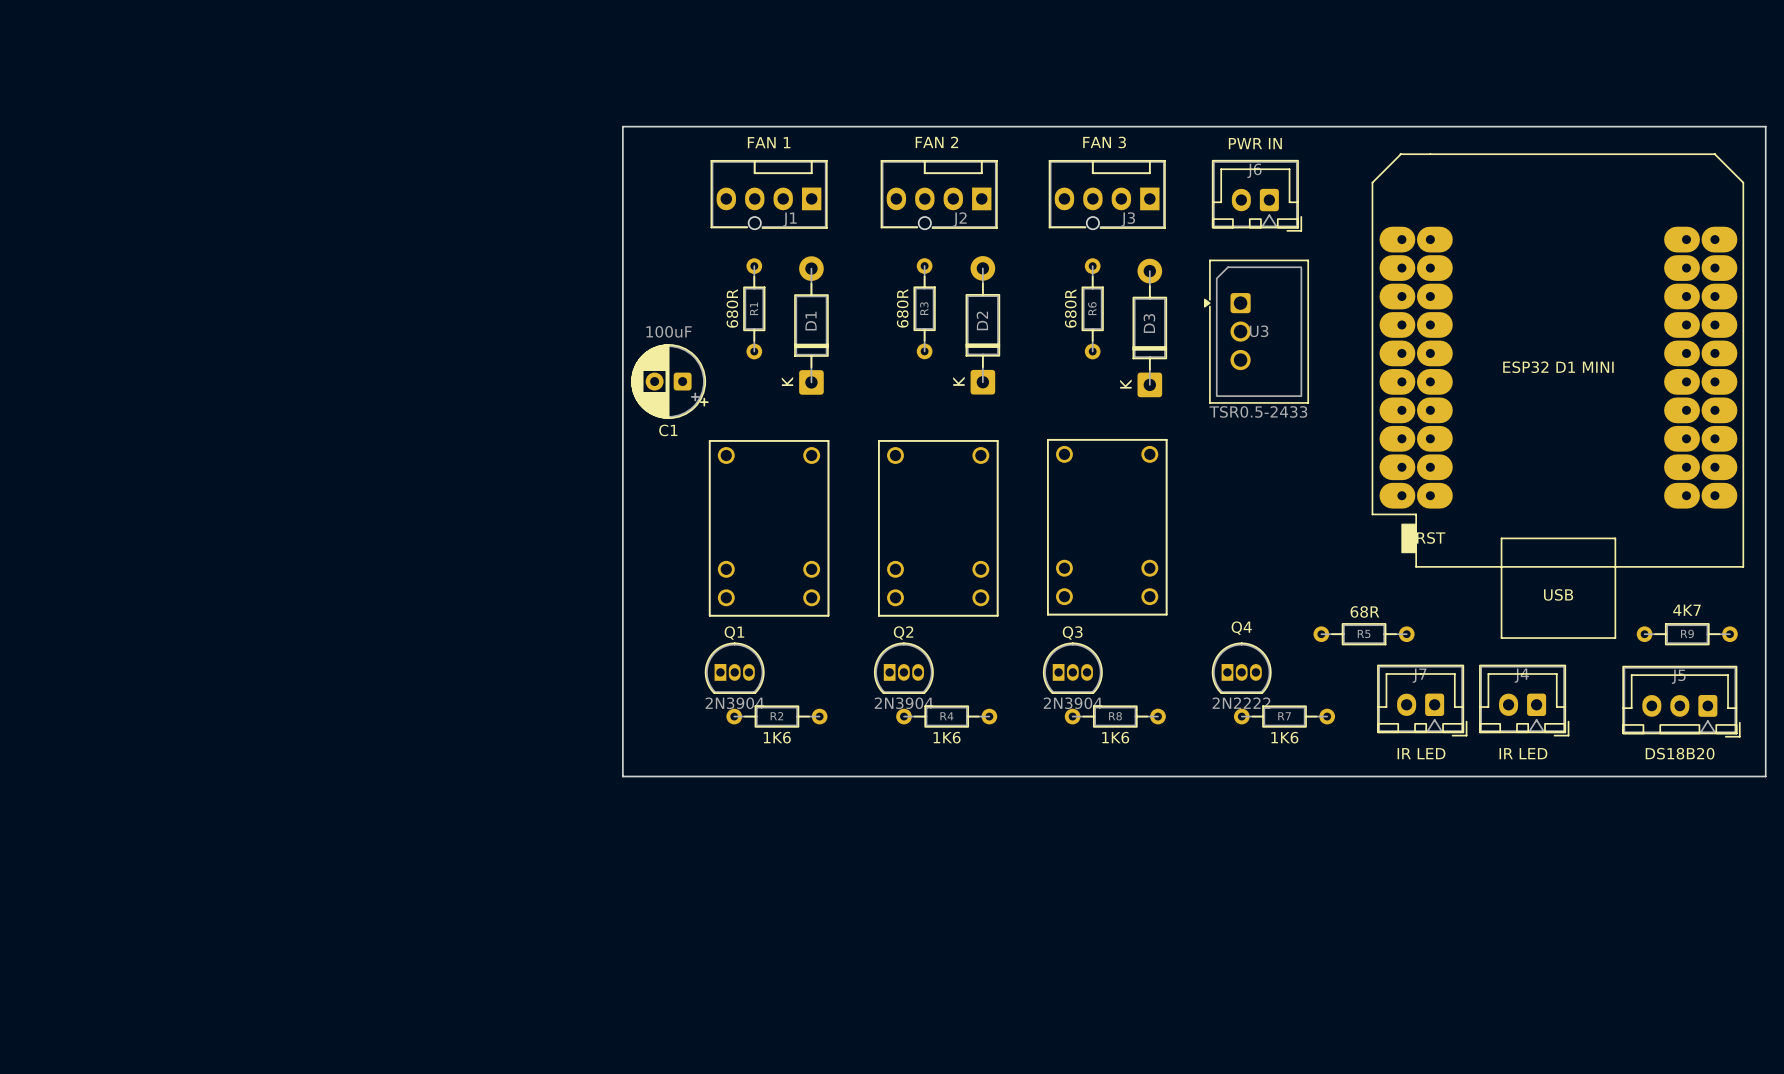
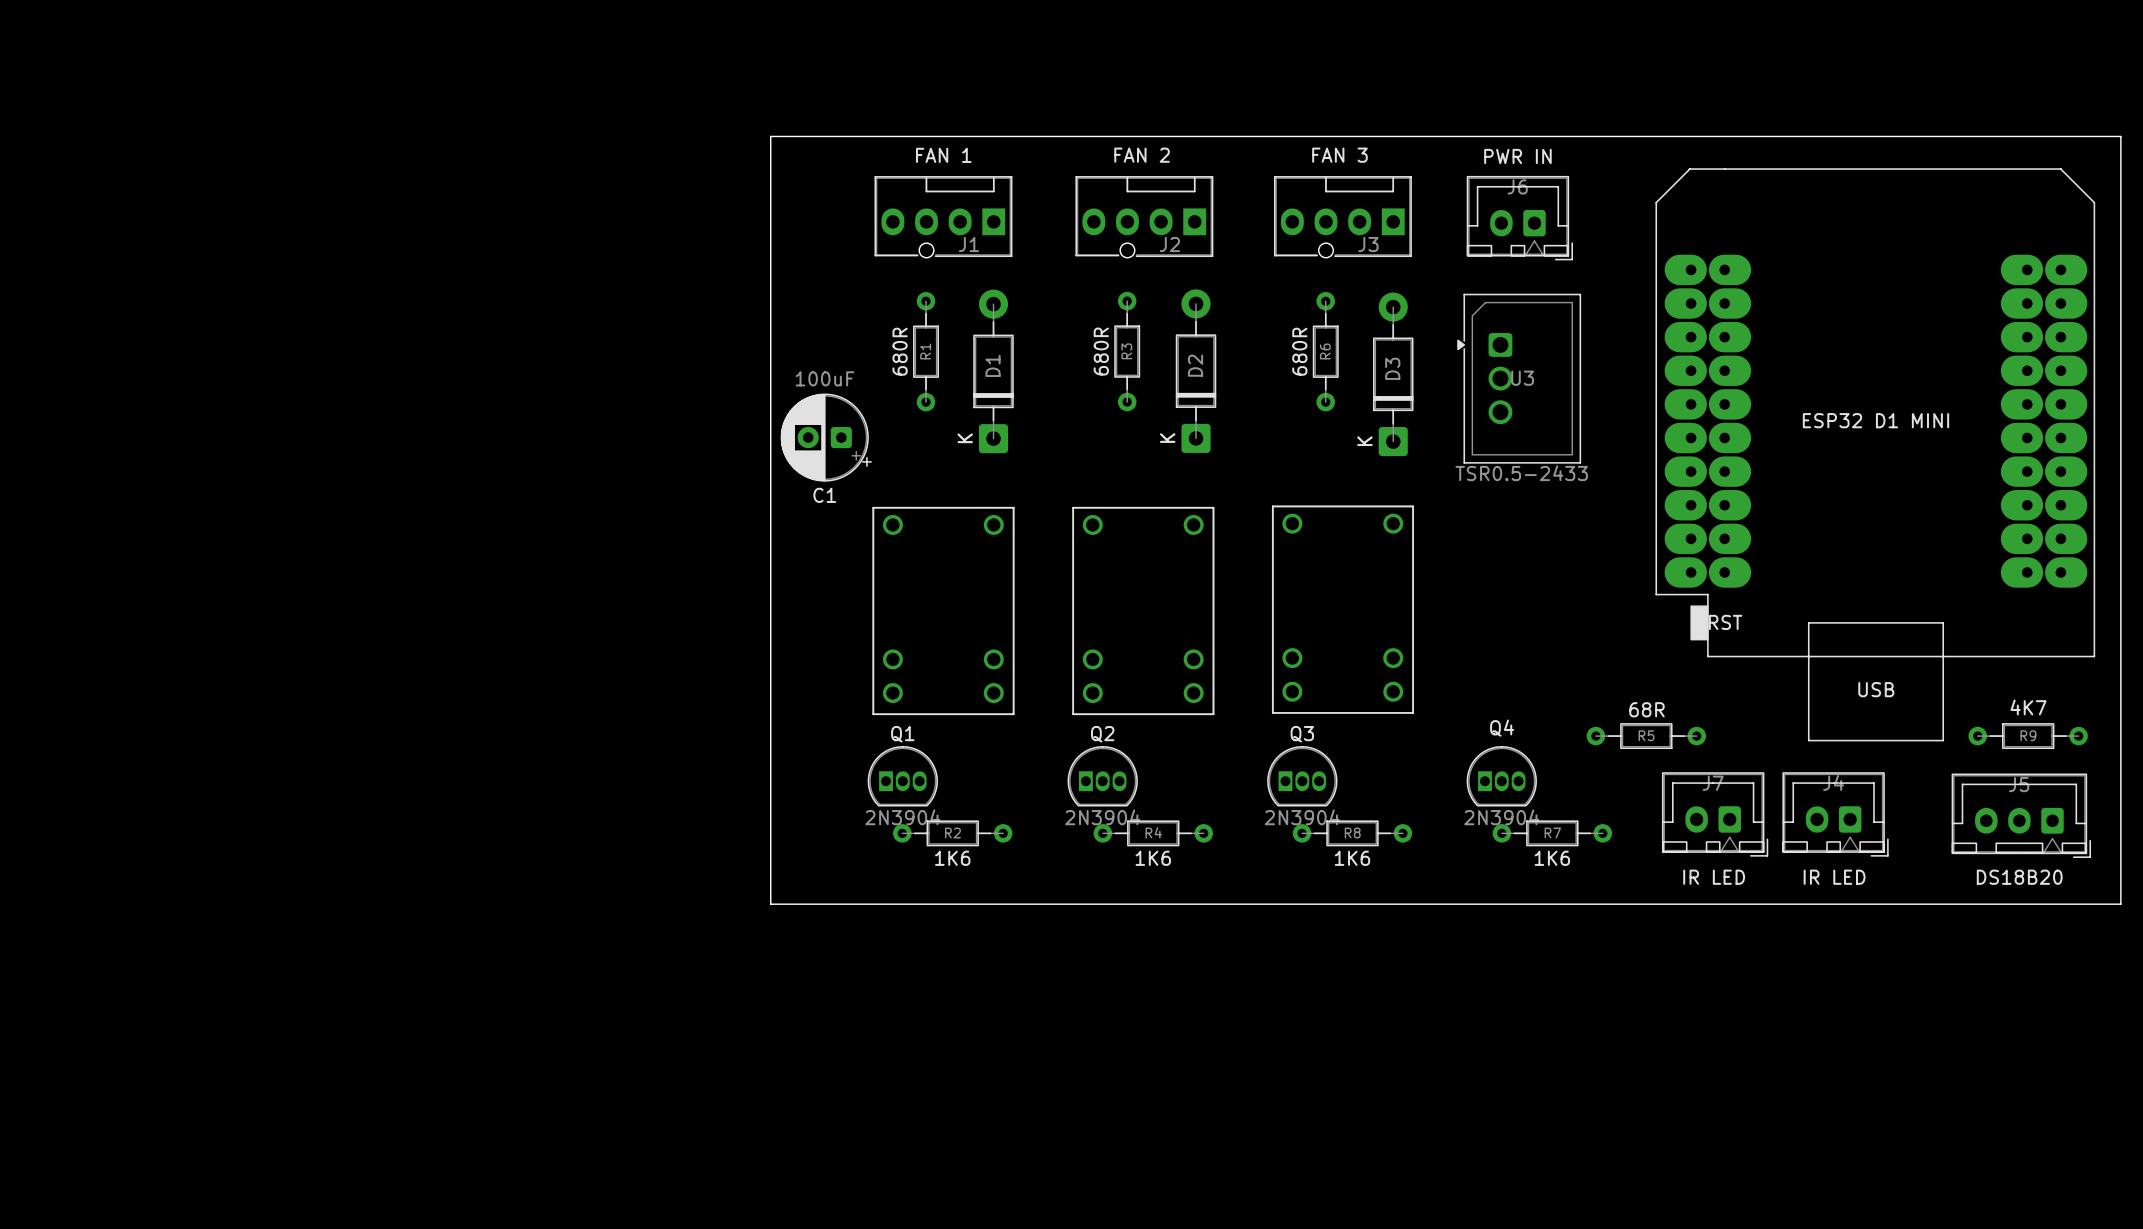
Q4 value: 2N2222 (1241, 703) -> 2N3904 (1501, 817)

